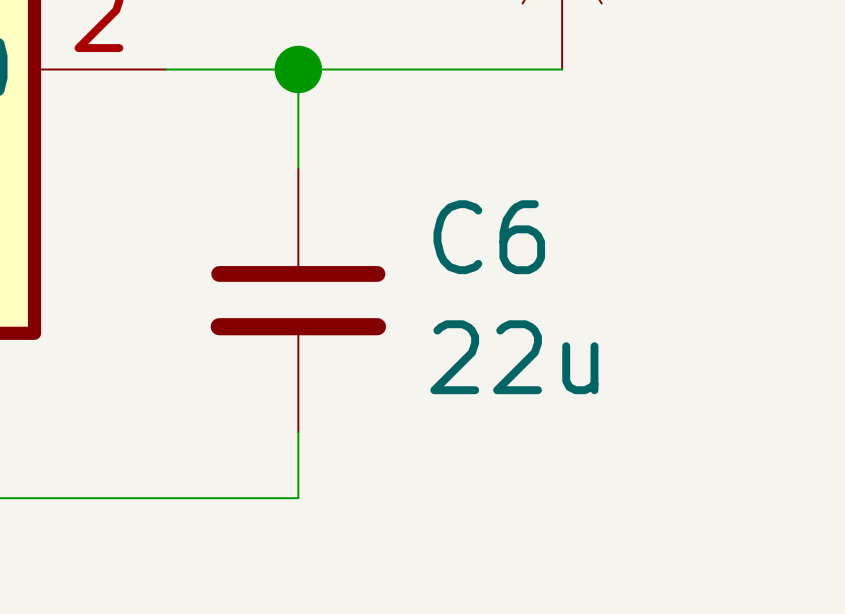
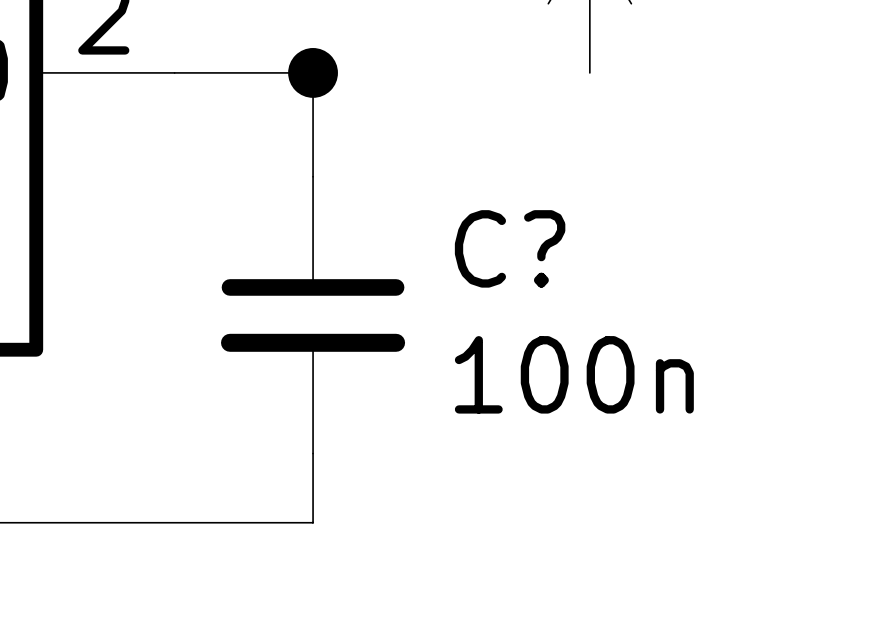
wire: (298, 69) (562, 69) -> none
C6 name: C6 (489, 237) -> C? (510, 248)
C6 value: 22u (514, 357) -> 100n (574, 374)

